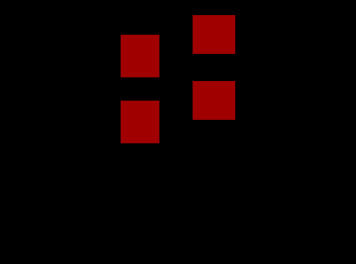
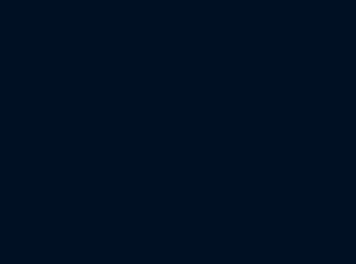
part: (213, 67) -> none
part: (140, 89) -> none

